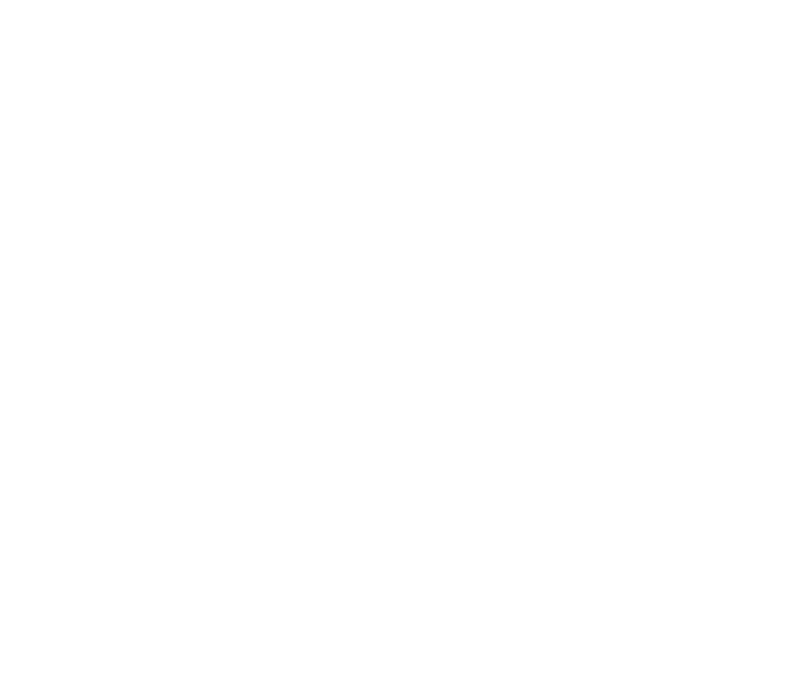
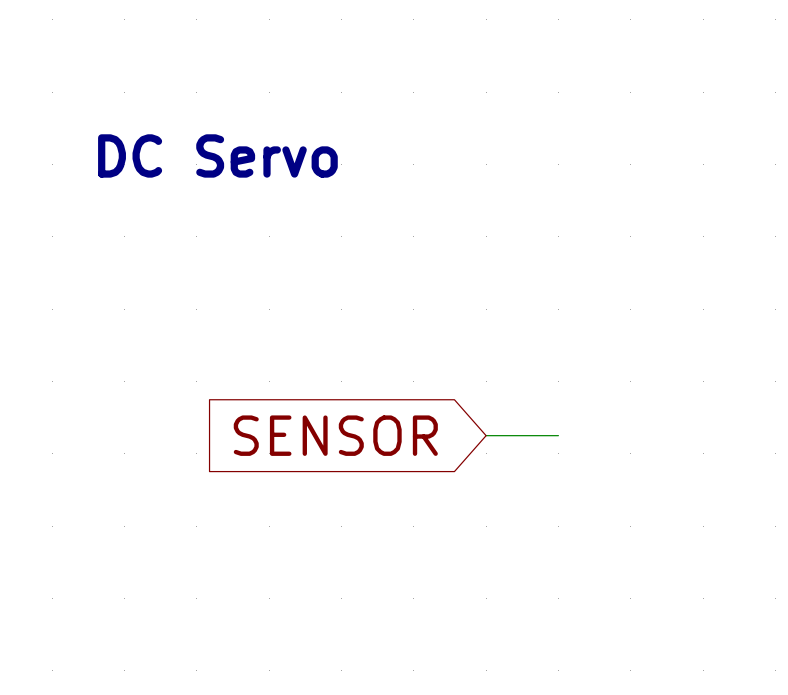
text: none -> DC Servo (217, 155)
global label: none -> SENSOR (335, 435)
wire: none -> (486, 435) (558, 435)

